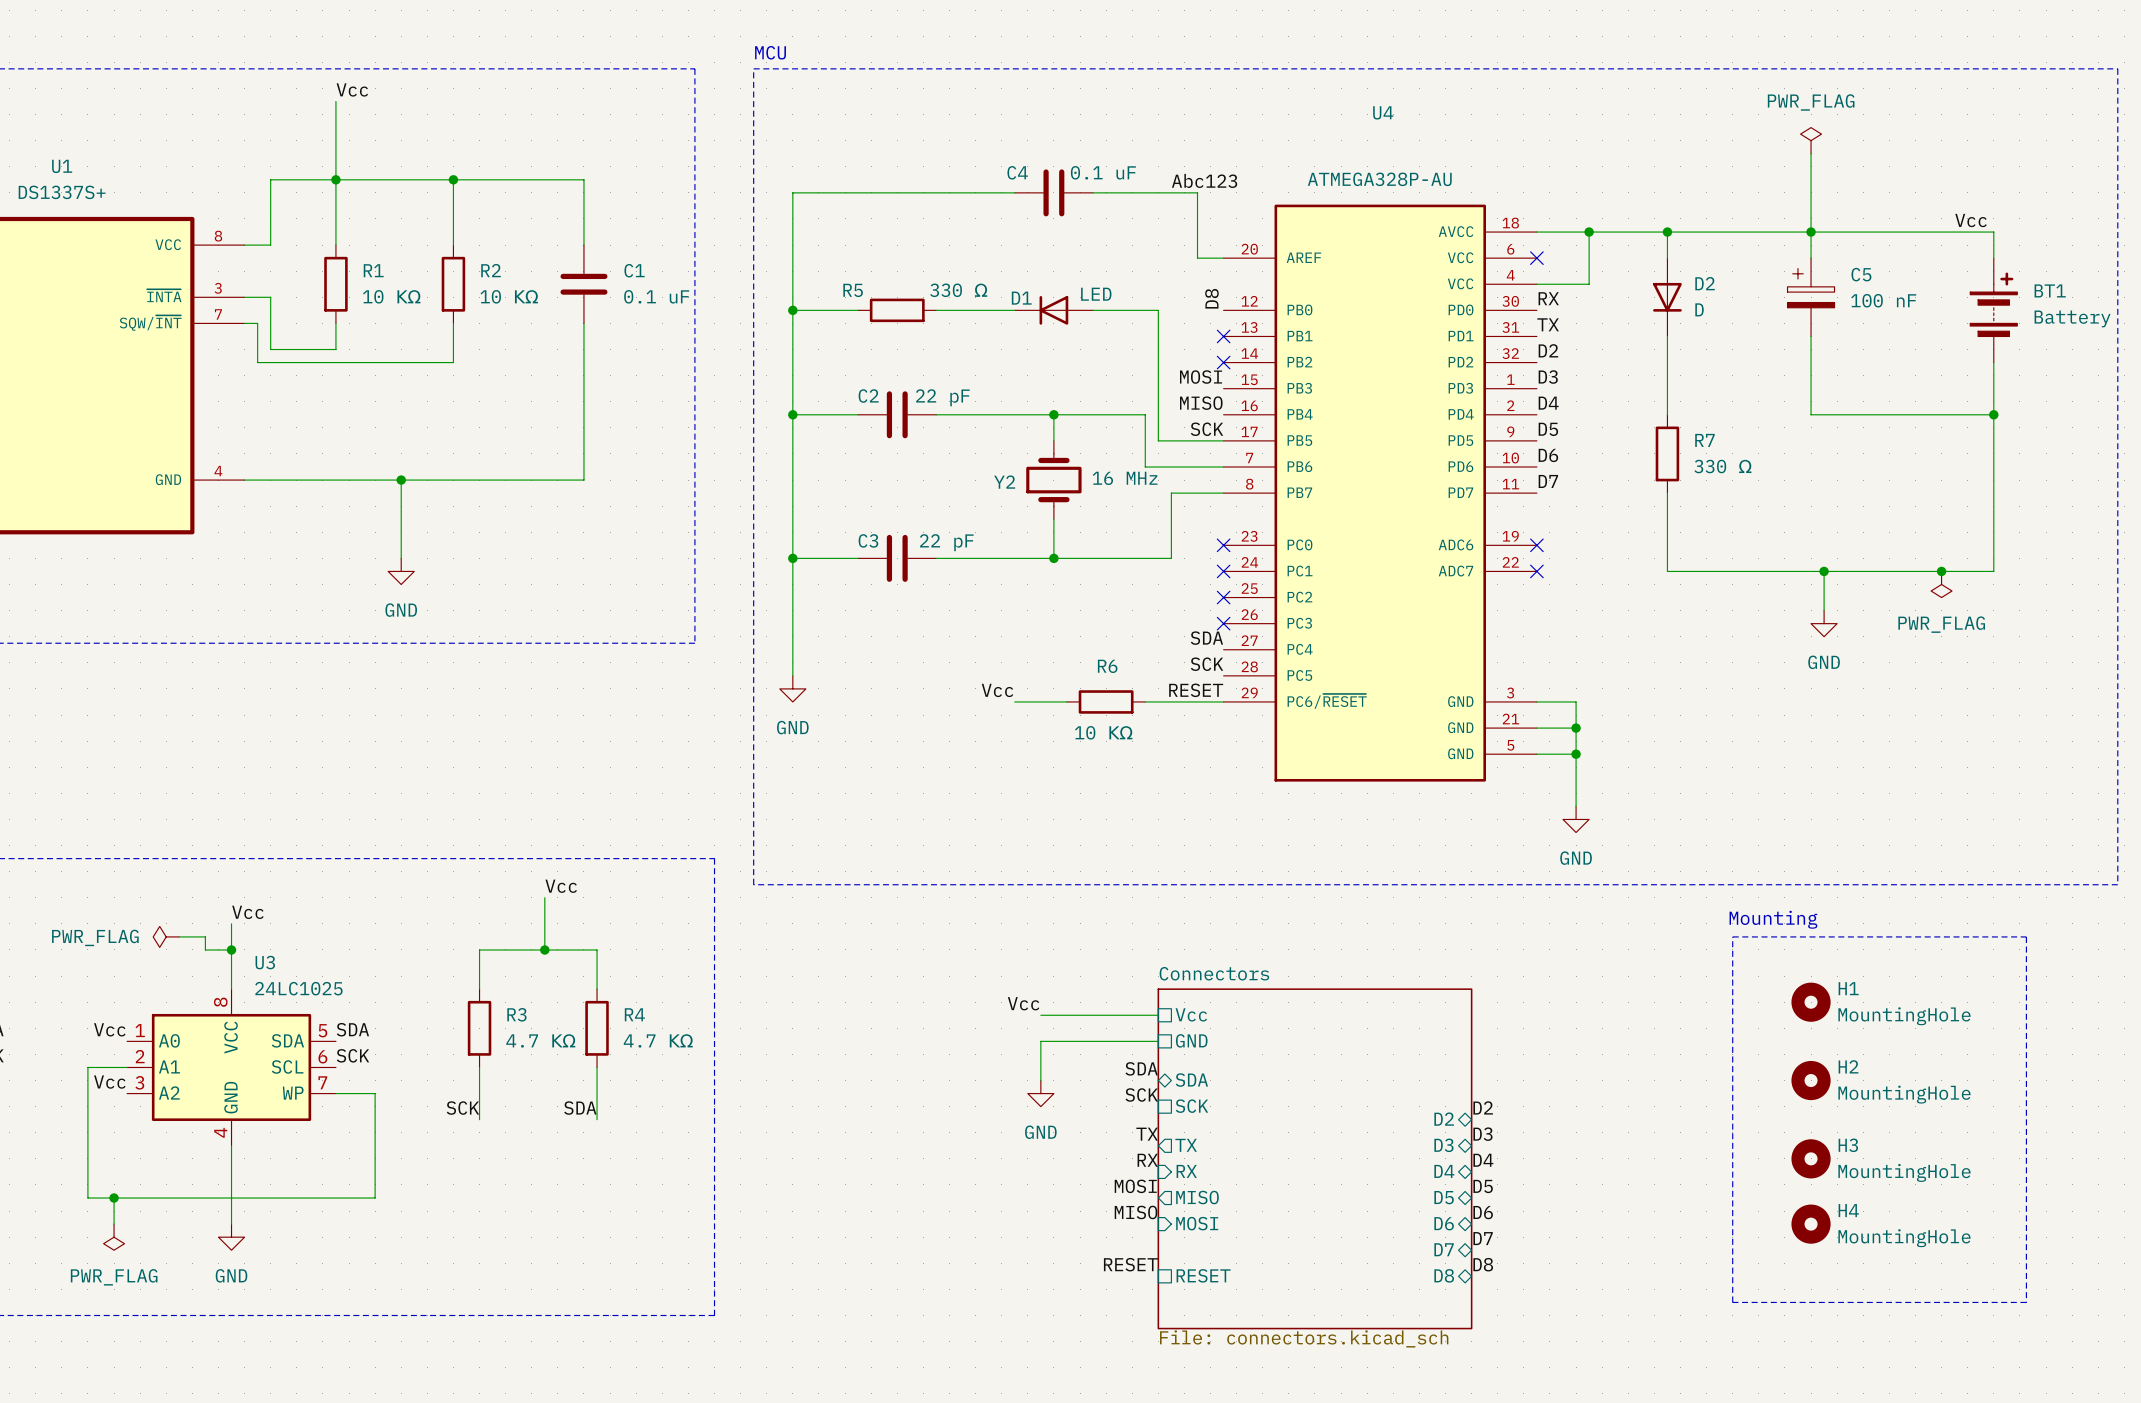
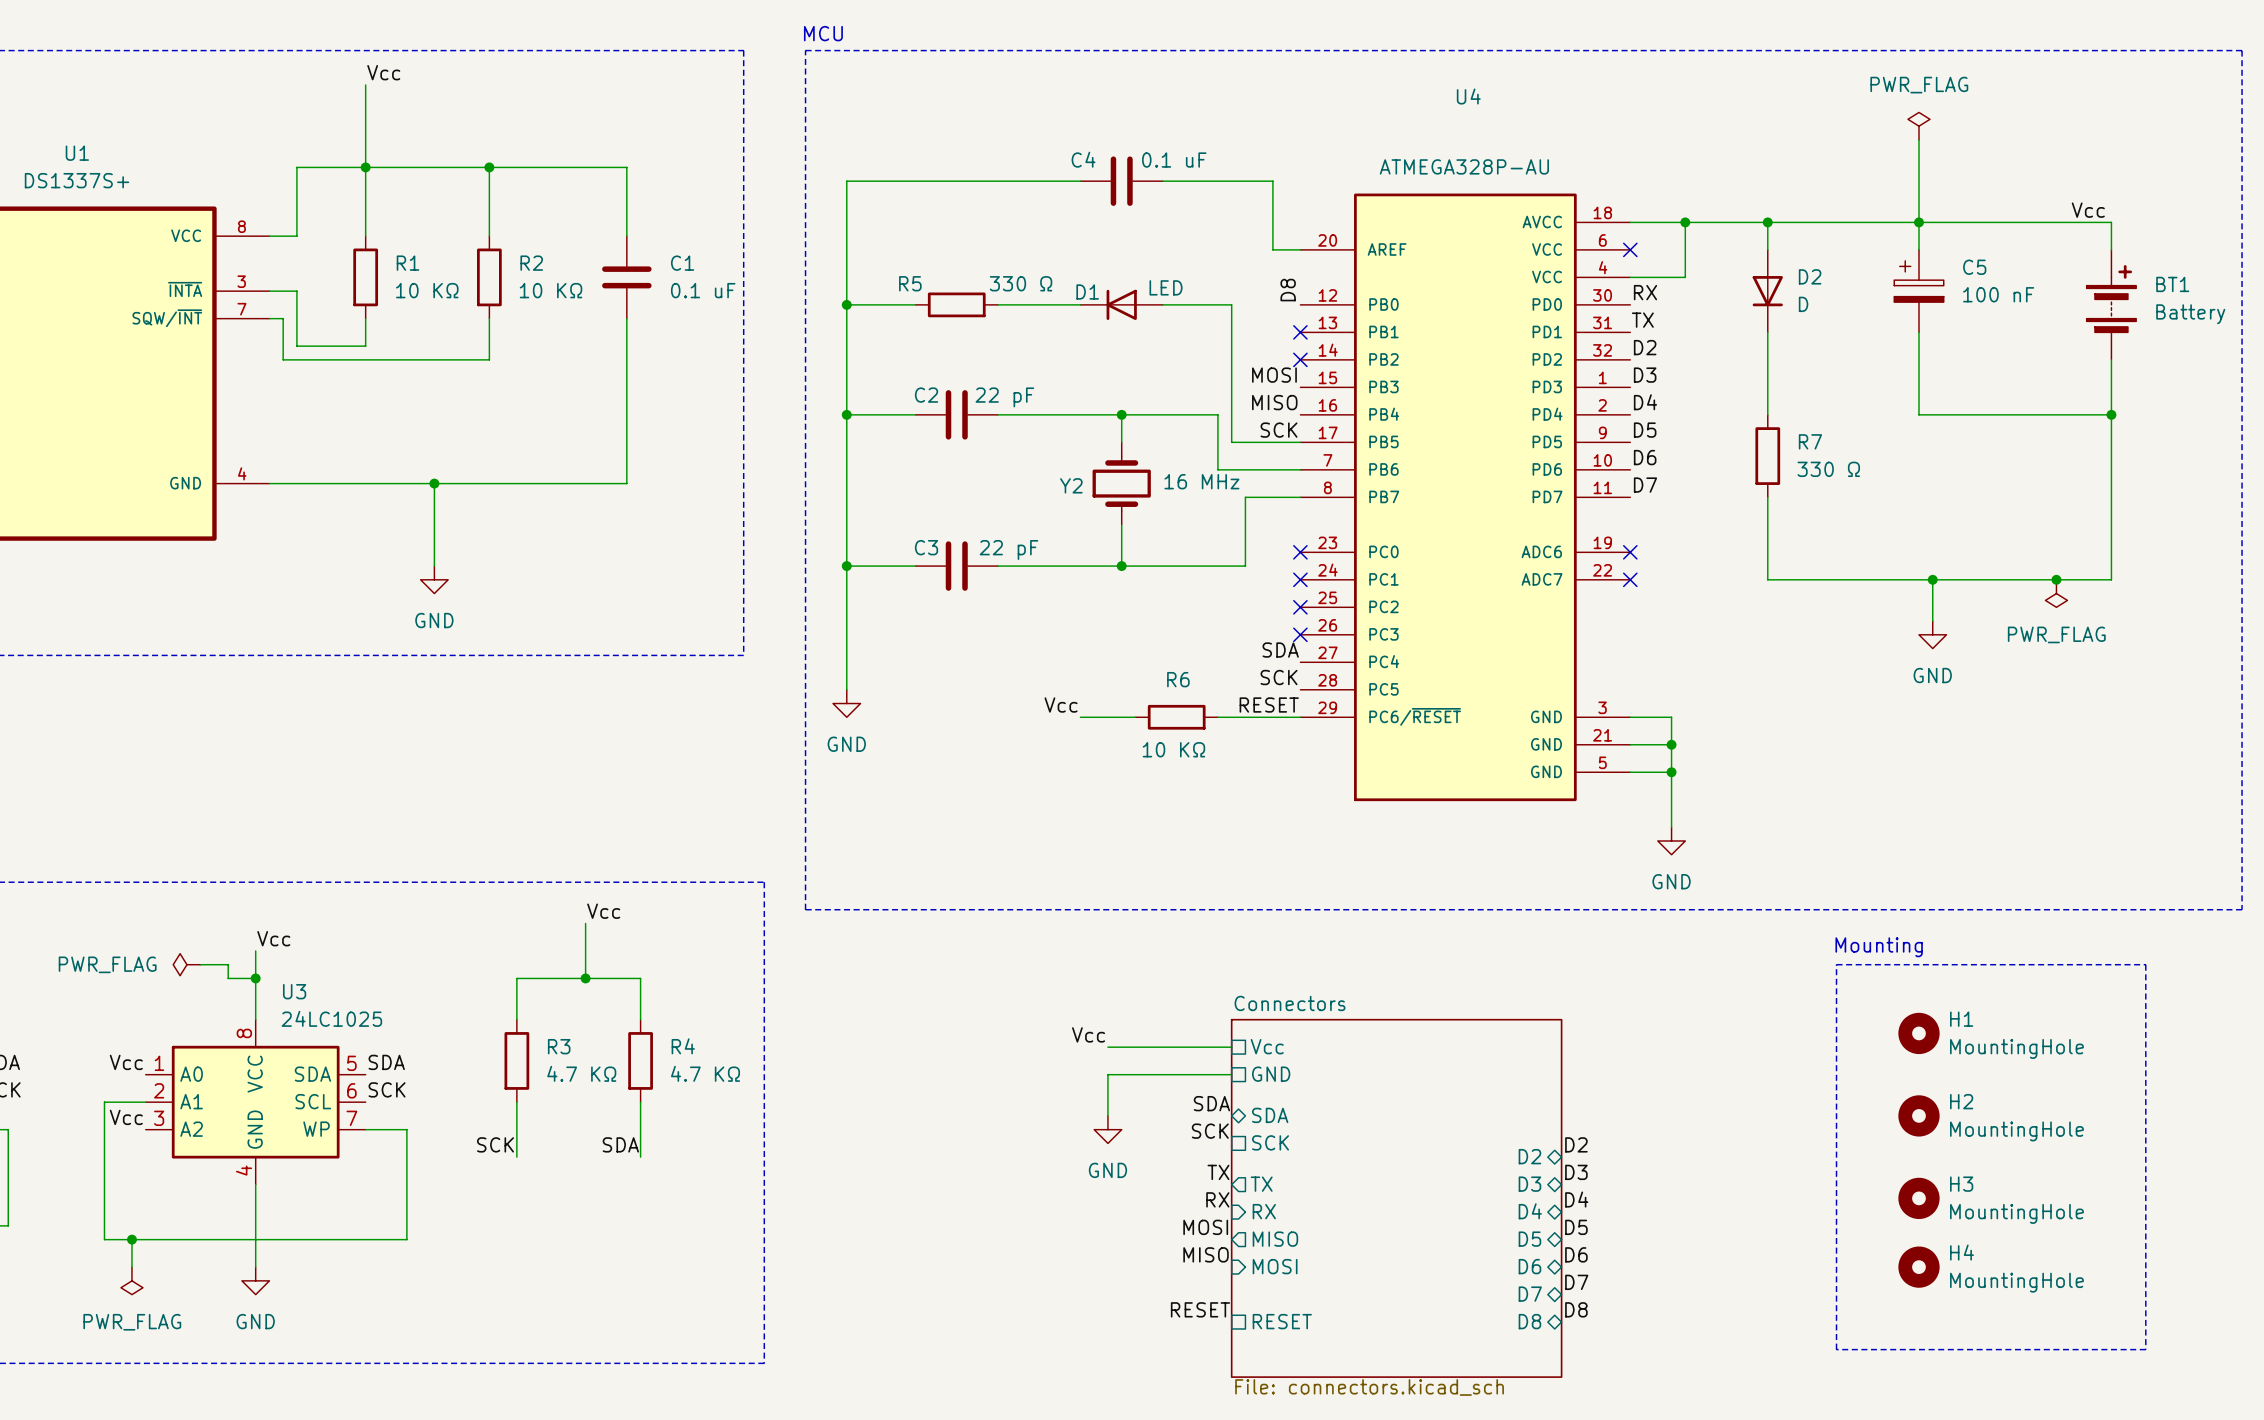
label: Abc123 (1204, 180) -> none

